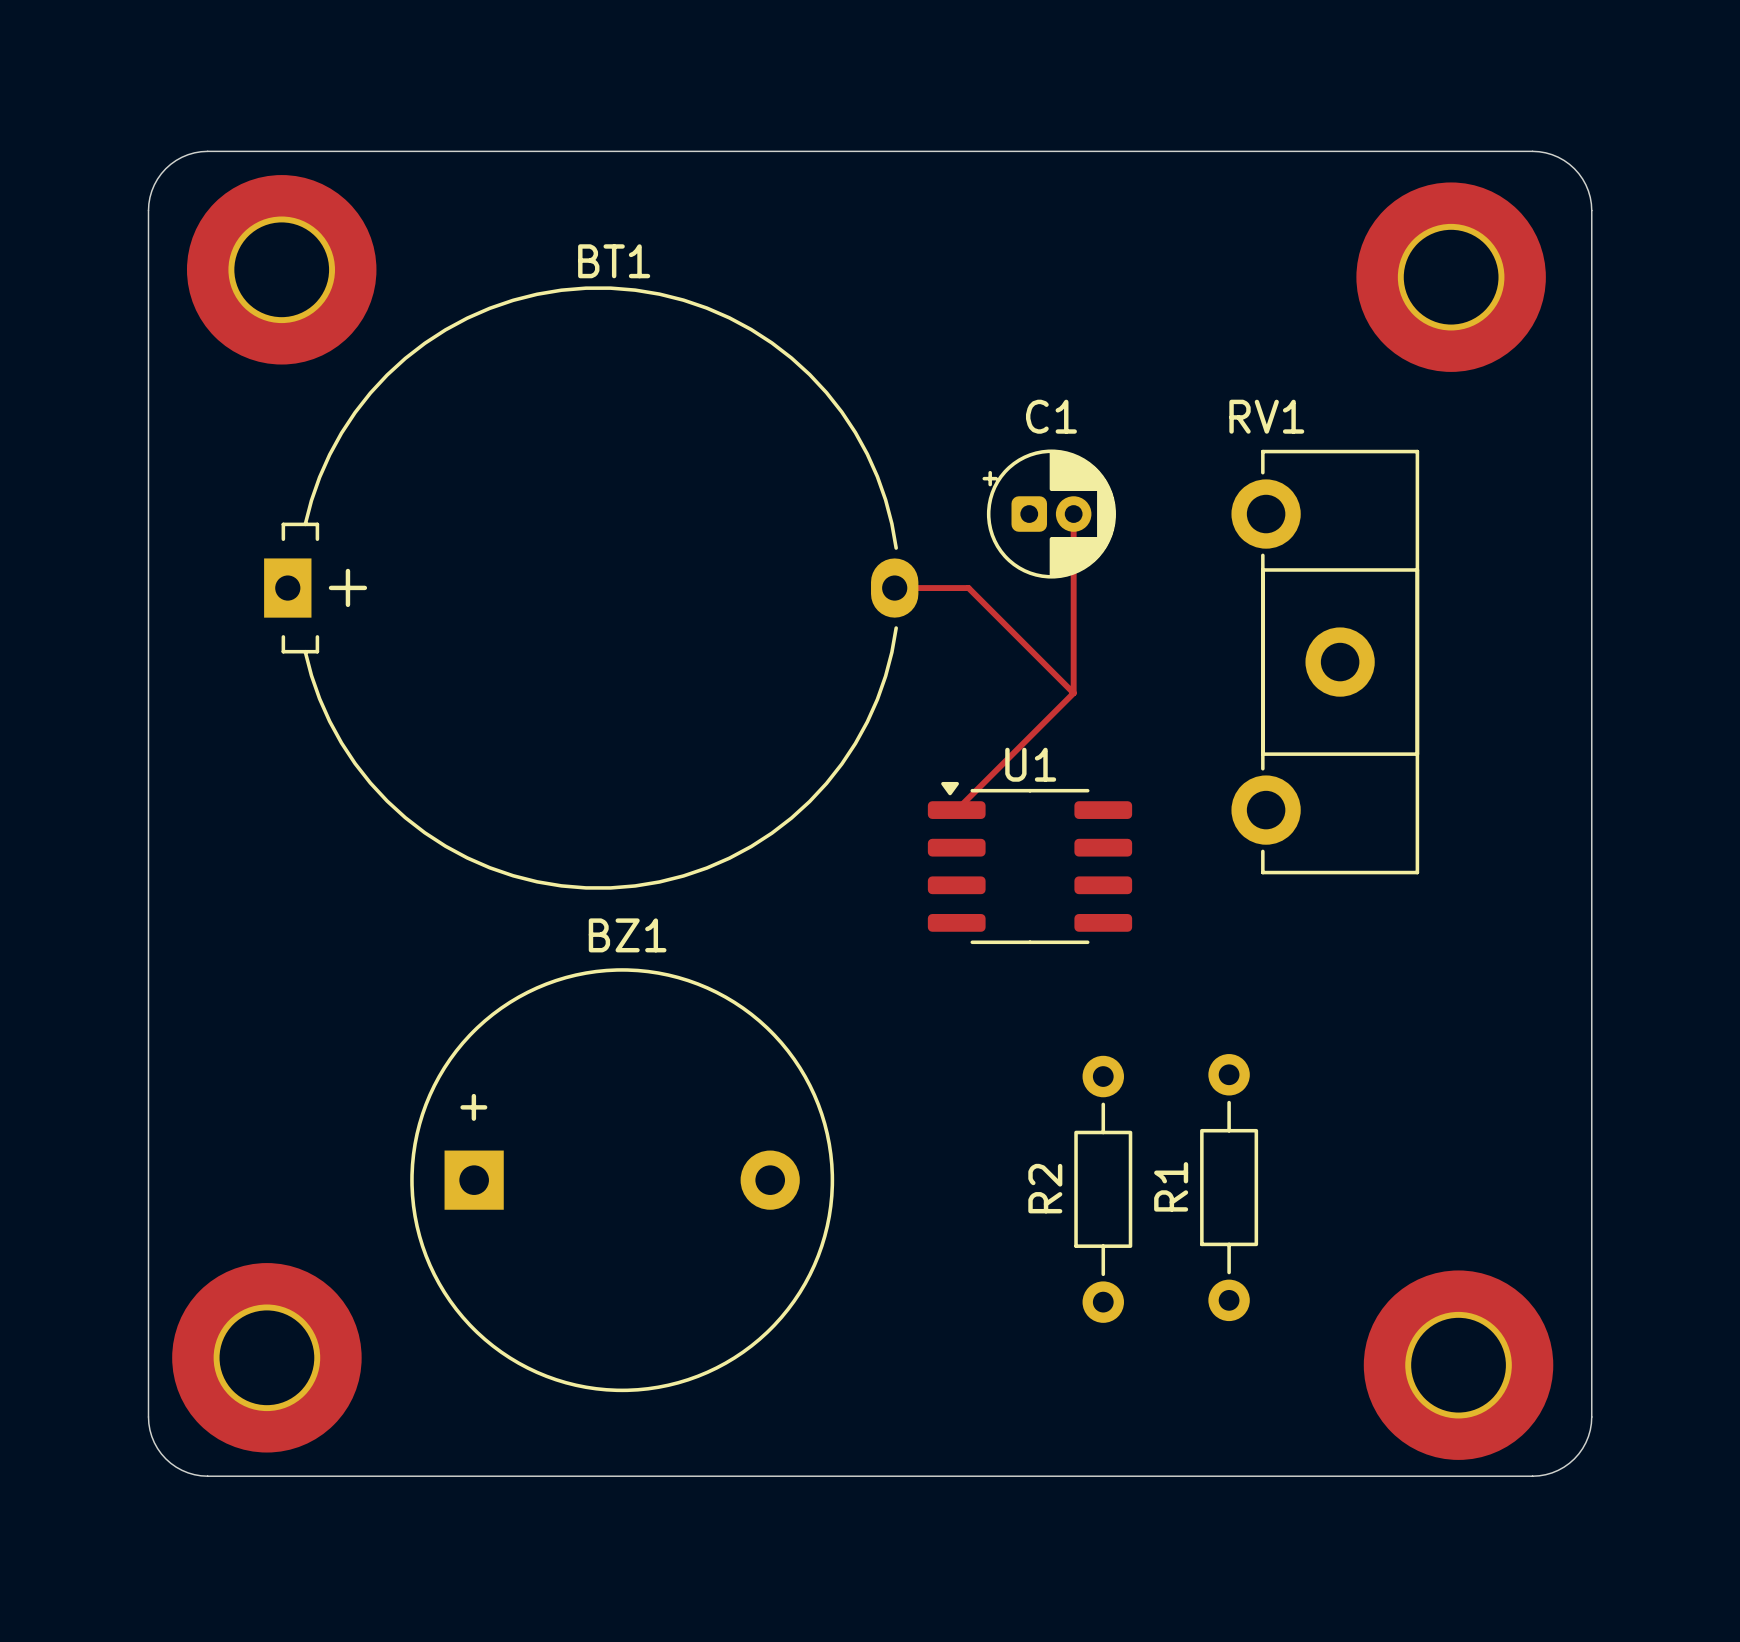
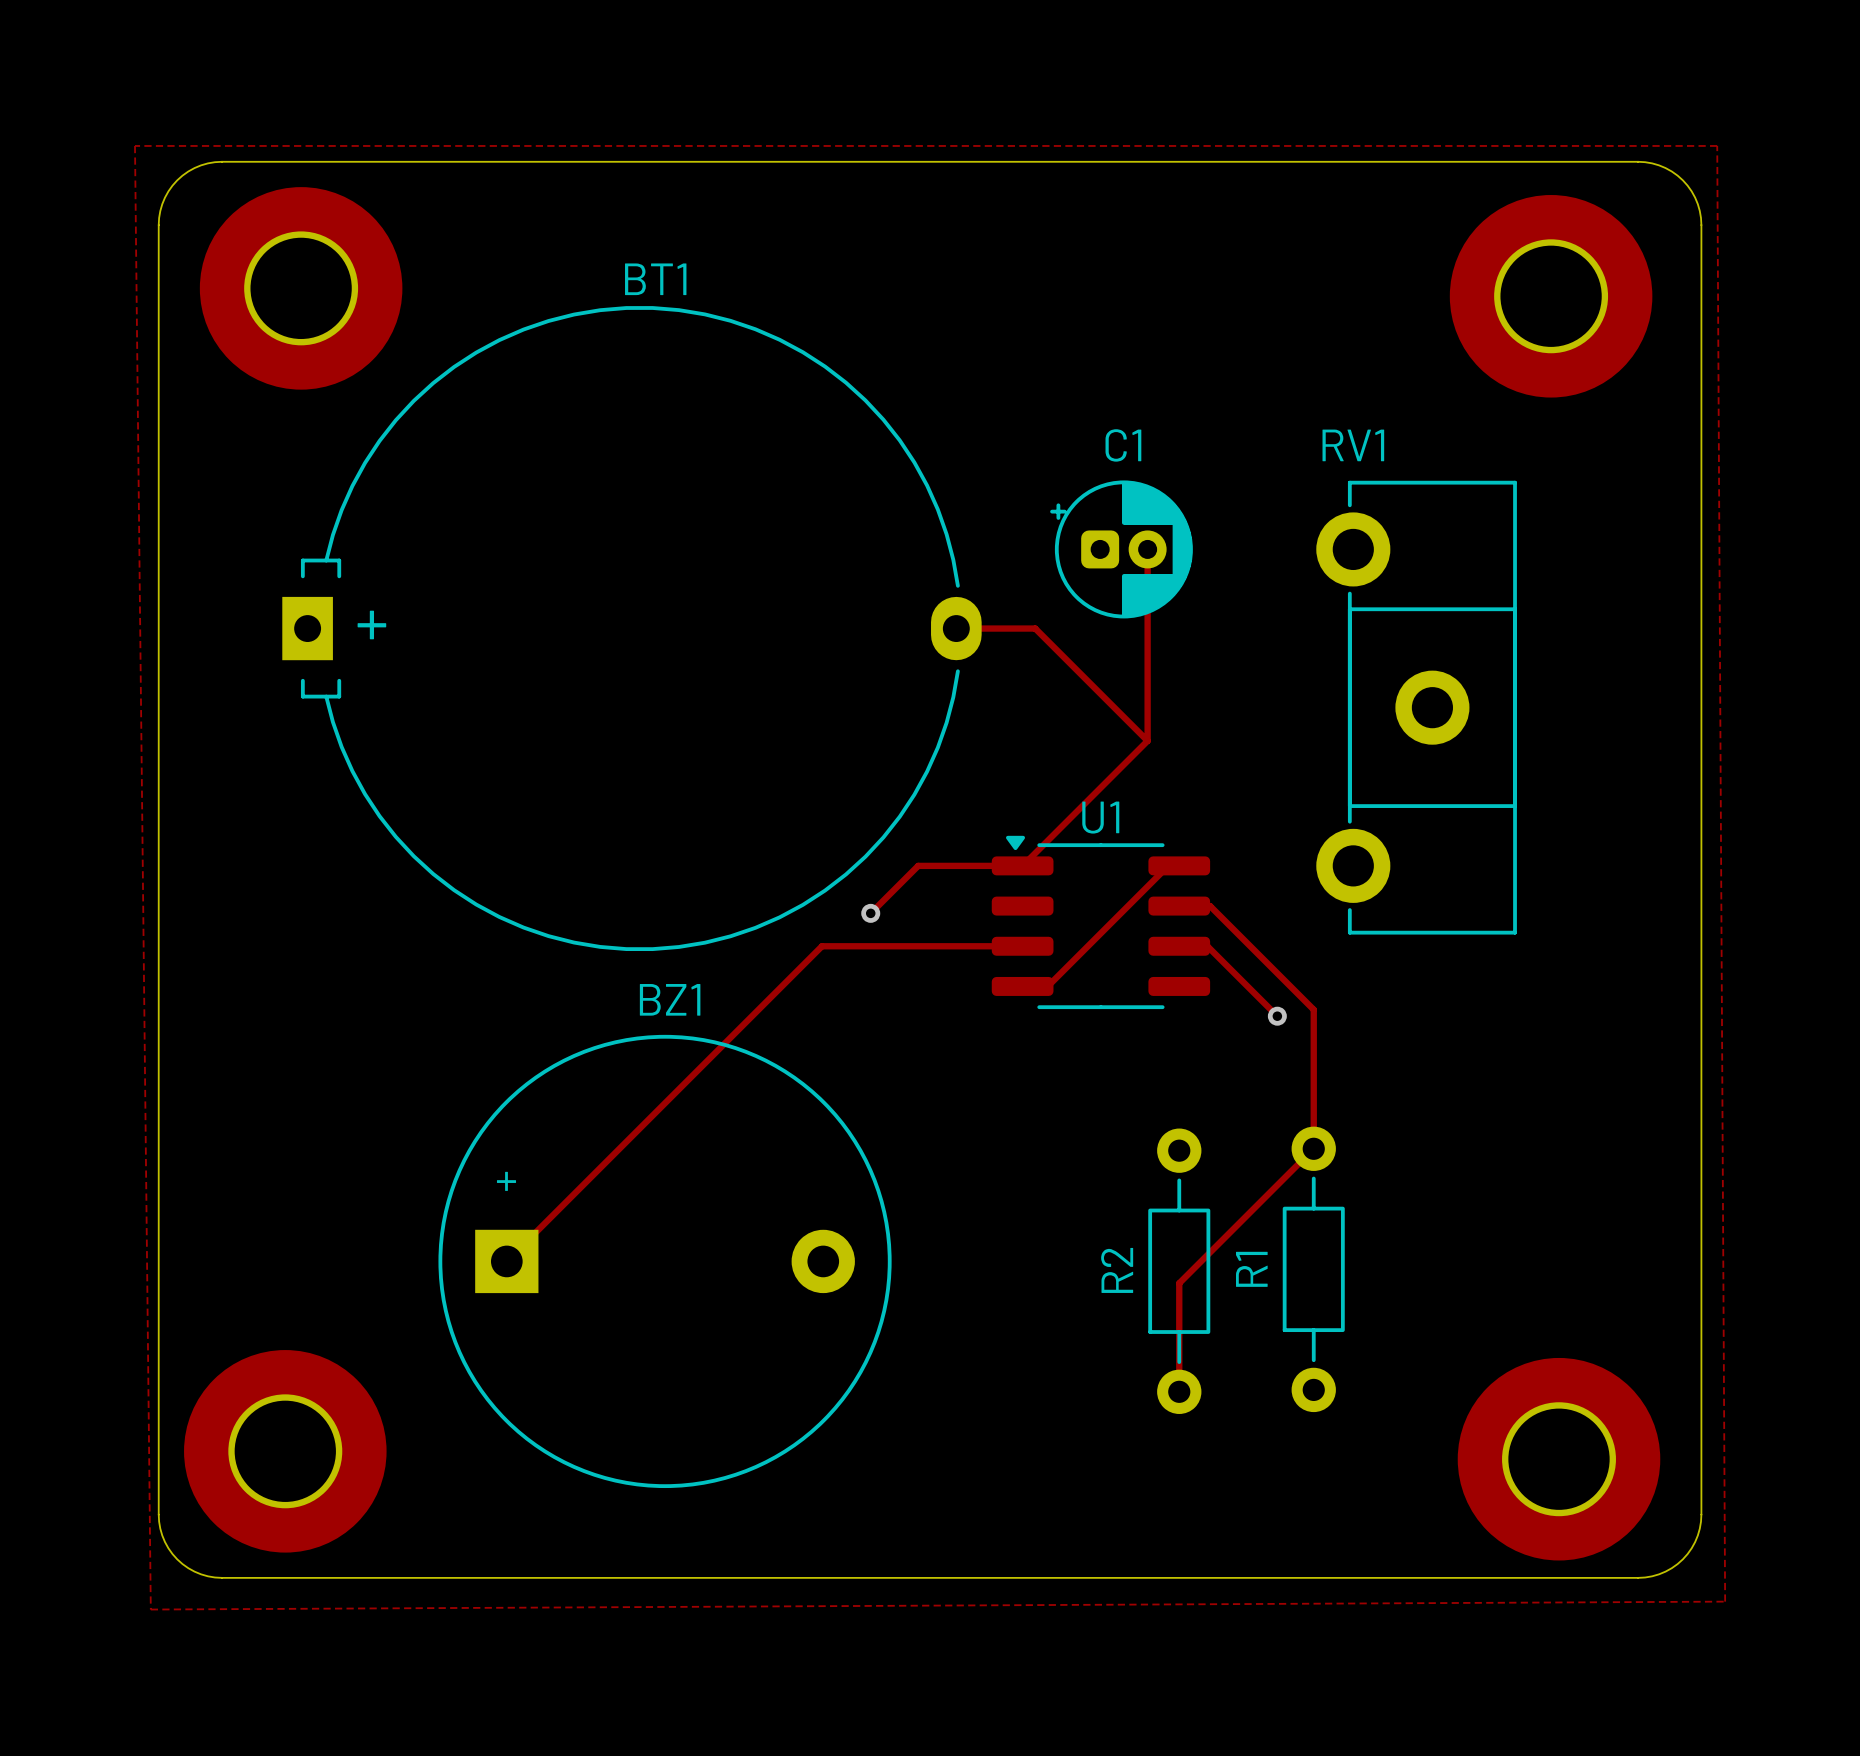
zone outline: none -> (134, 145) (150, 1609) (1725, 1601) (1717, 145) (134, 145)
track: none -> (1022, 865) (918, 865) (870, 913)
track: none -> (1179, 865) (1168, 865) (1047, 986) (1022, 986)
track: none -> (1179, 906) (1210, 906) (1313, 1009) (1313, 1148) (1179, 1283) (1179, 1391)
via: none -> (870, 913)
track: none -> (1022, 946) (821, 946) (506, 1261)
track: none -> (1179, 946) (1207, 946) (1277, 1016)
via: none -> (1277, 1016)

